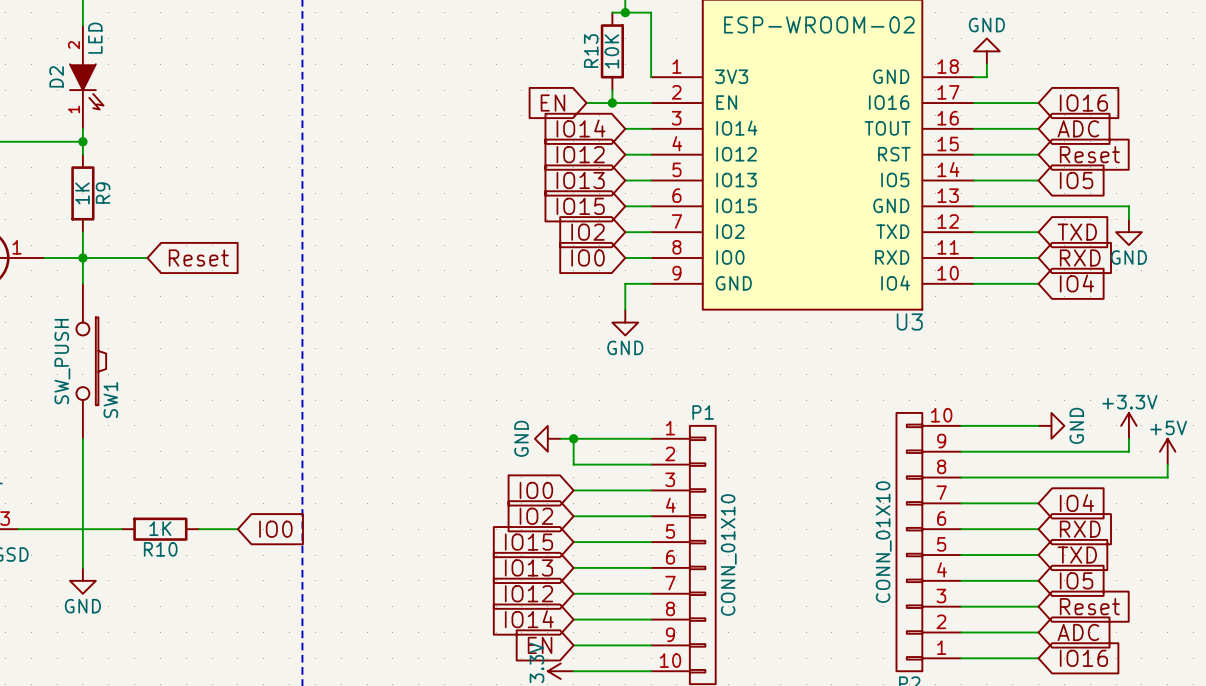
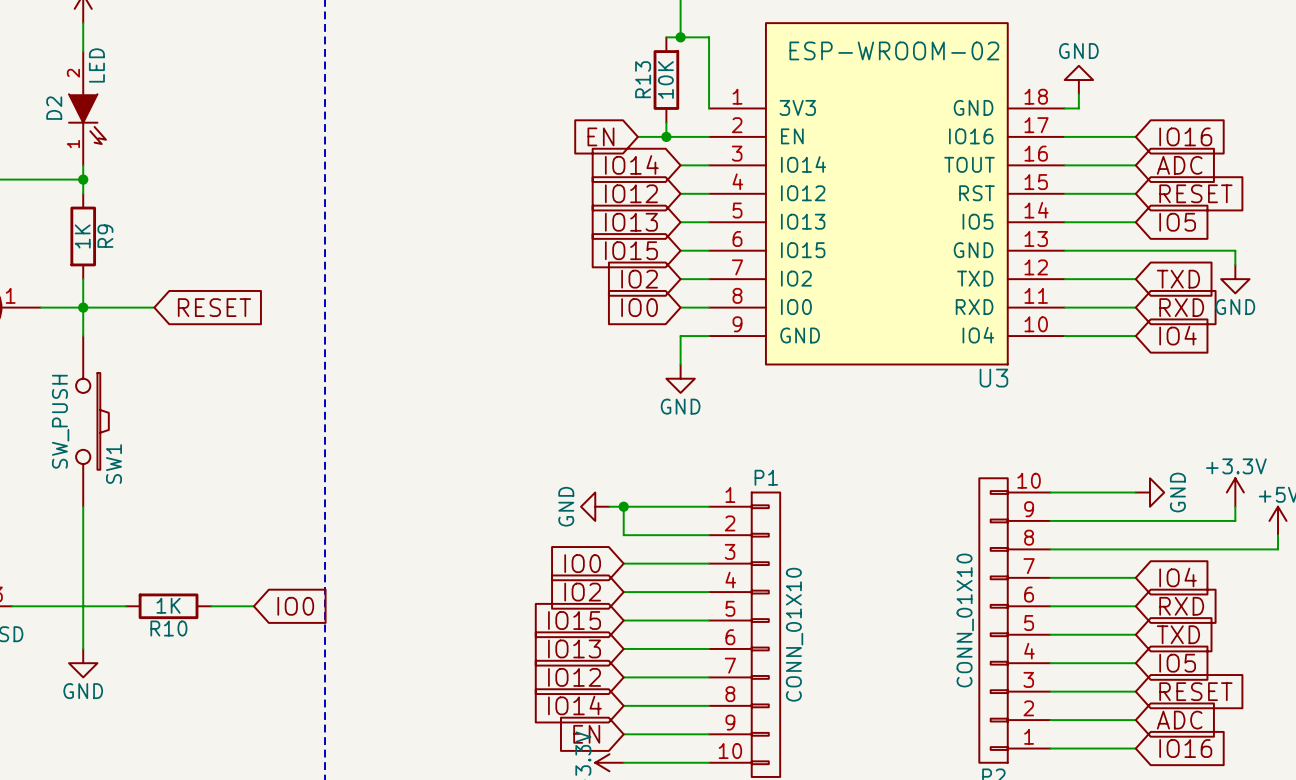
global label: Reset (1089, 154) -> RESET (1195, 193)
global label: Reset (198, 257) -> RESET (214, 307)
global label: Reset (1089, 606) -> RESET (1195, 691)

